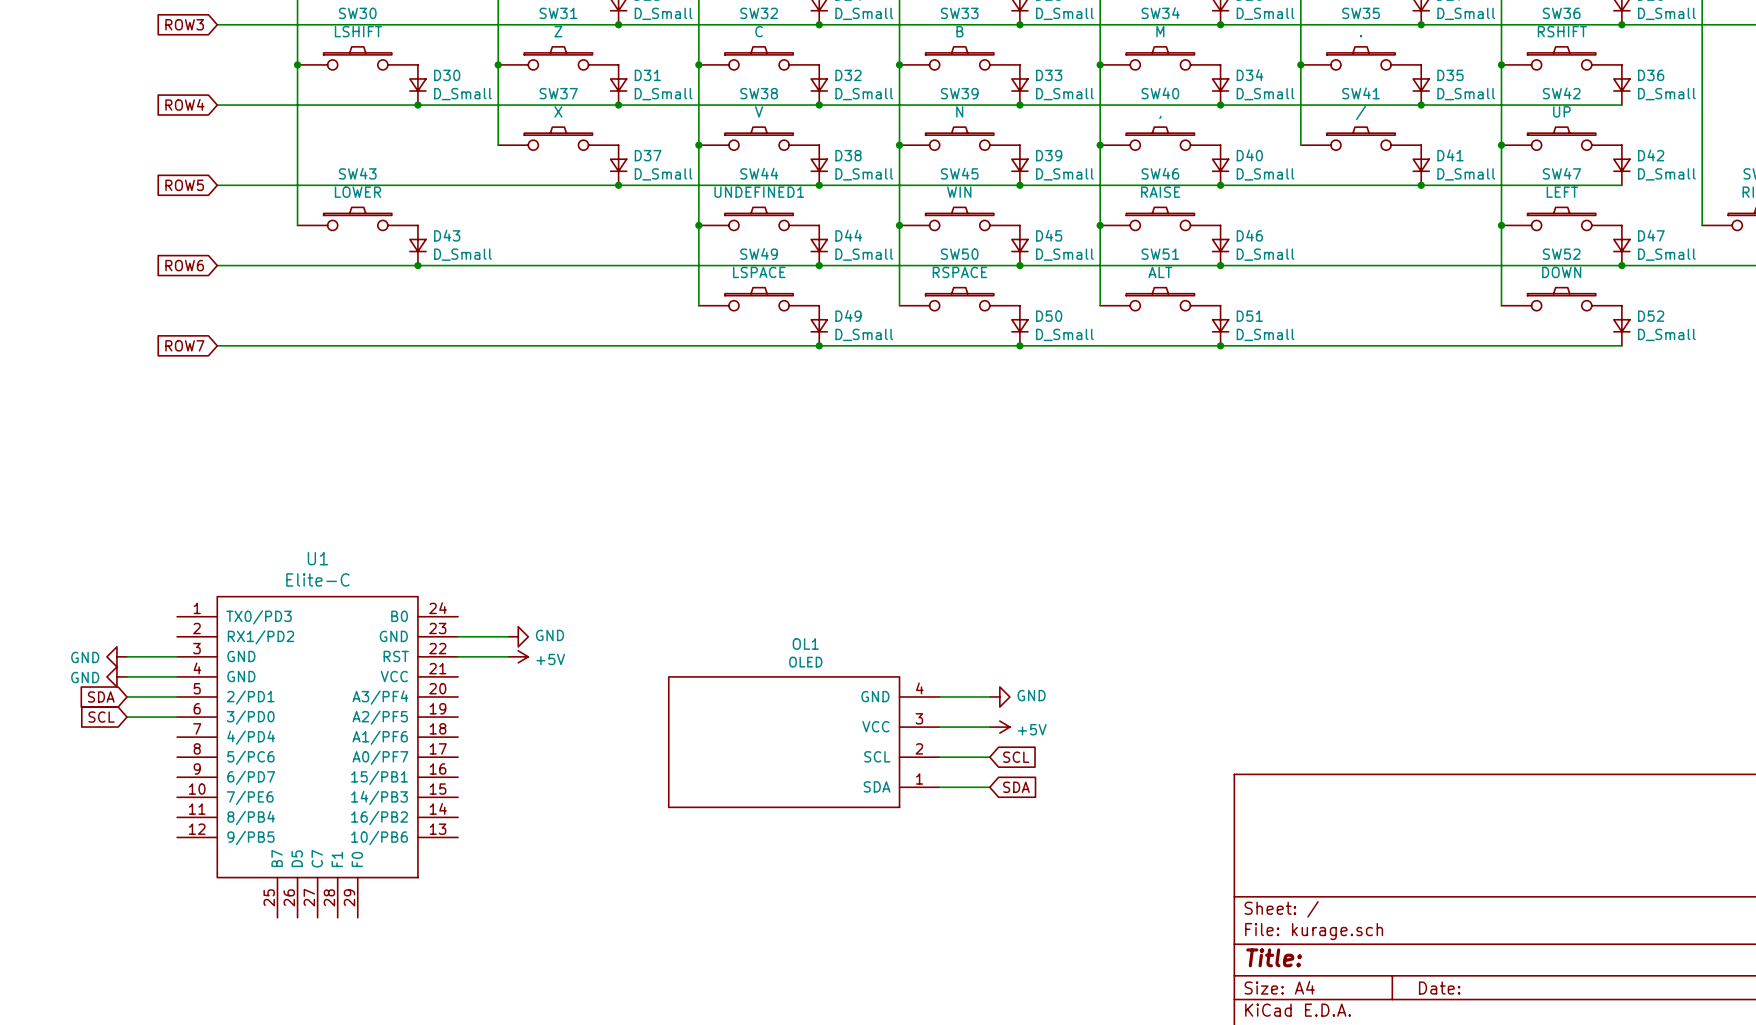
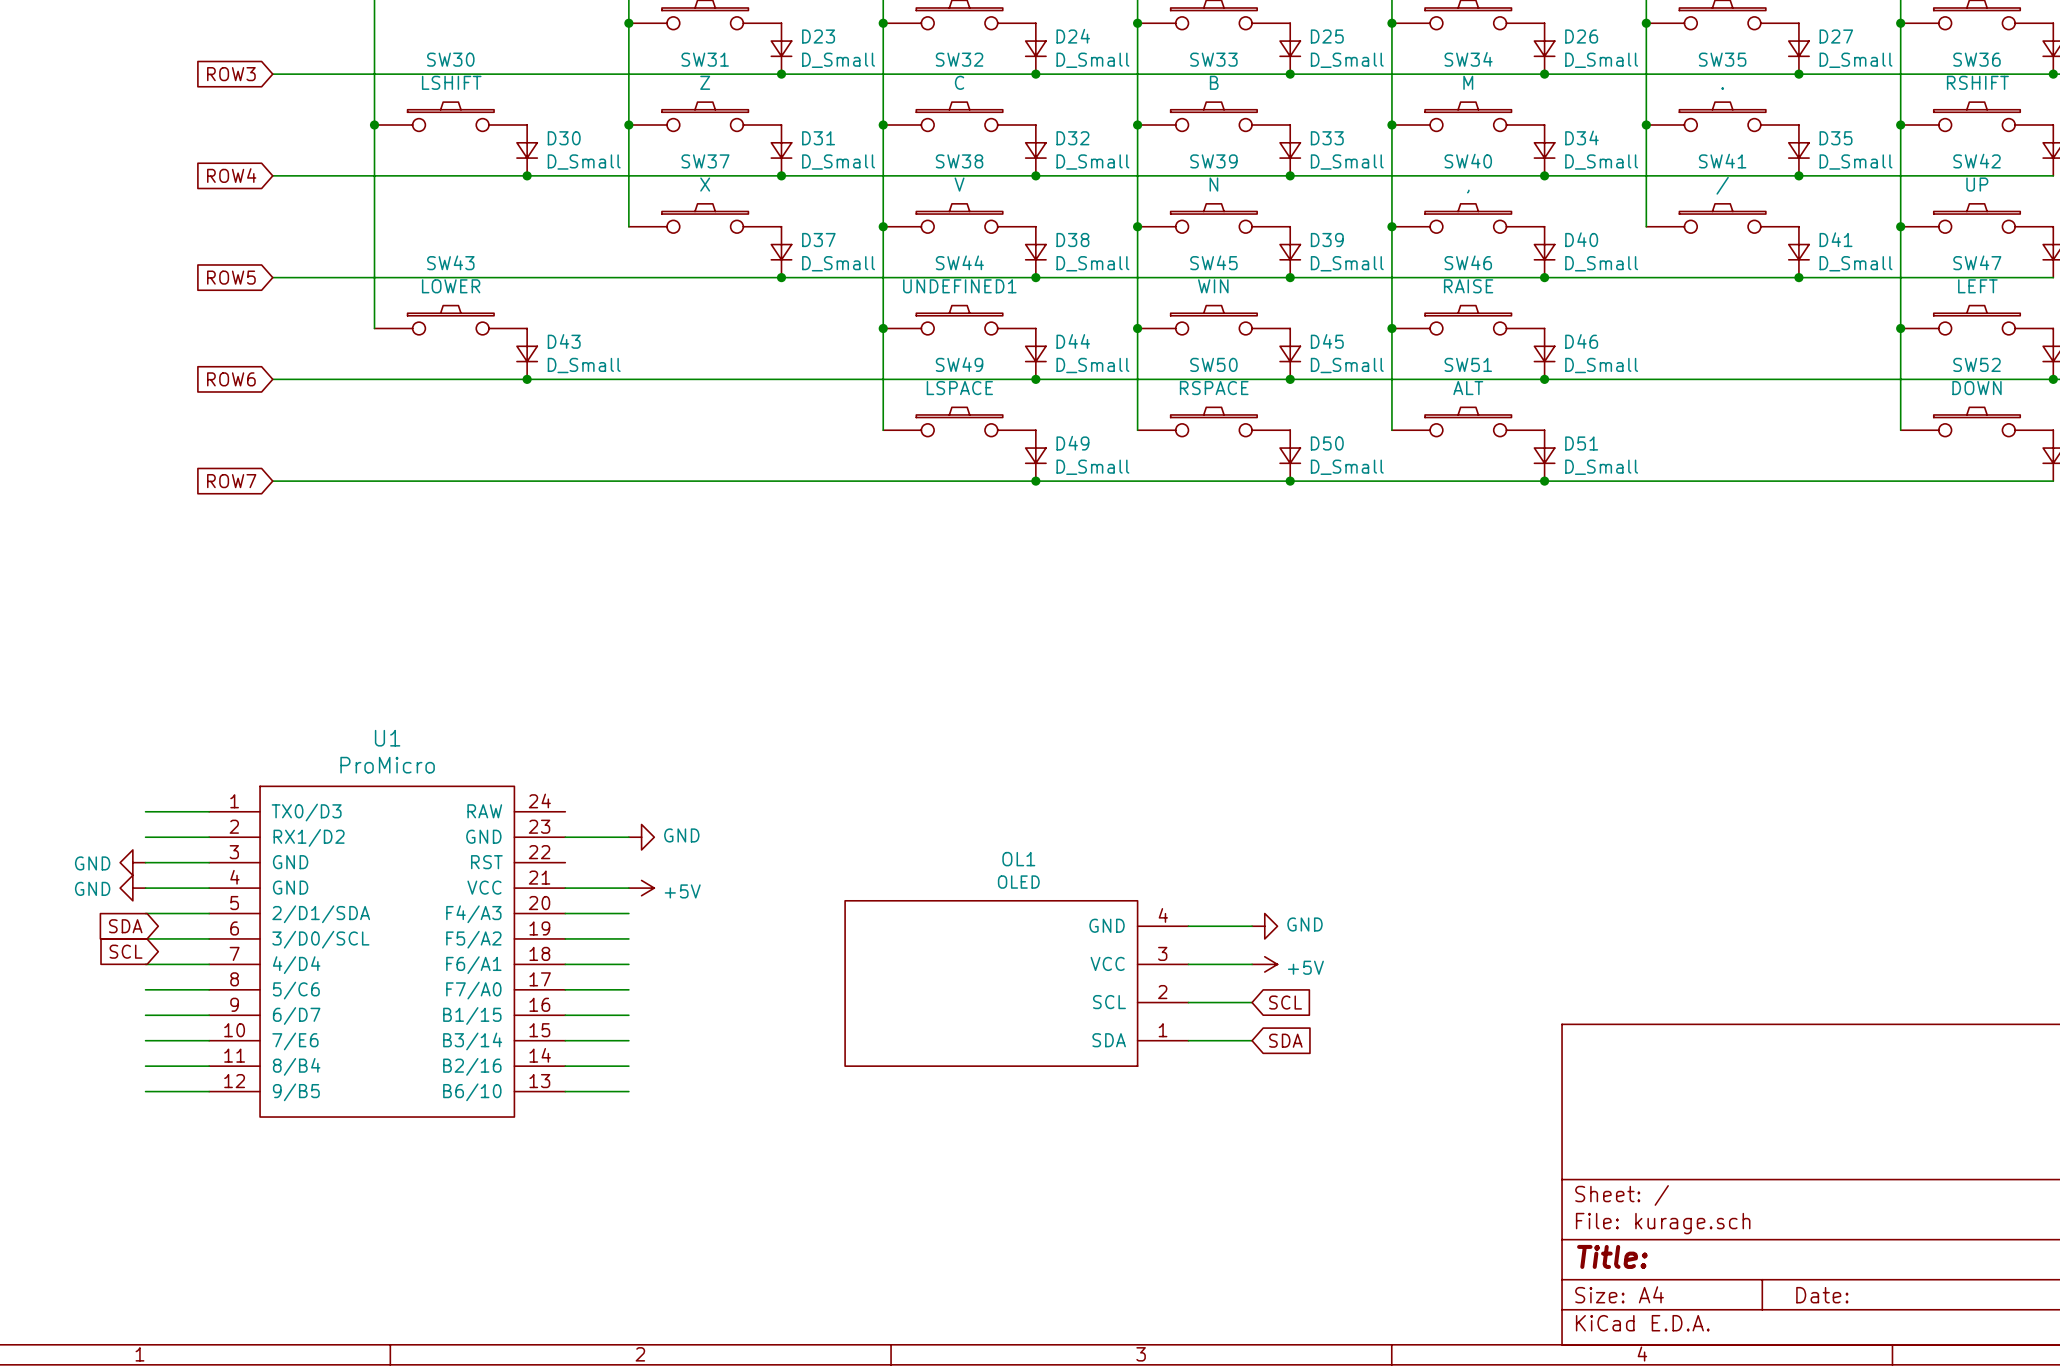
U1 name position: U1 (317, 558) -> U1 (387, 738)
U1 value: Elite-C (317, 579) -> ProMicro (387, 765)
U1 symbol: [177, 596, 459, 918] -> [209, 786, 566, 1118]
wire: none -> (145, 811) (209, 811)
wire: none -> (145, 837) (209, 837)
wire: none -> (565, 837) (628, 837)
wire: (458, 636) (508, 636) -> (565, 888) (628, 888)
power symbol position: GND (518, 636) -> GND (641, 837)
power symbol: none -> GND (132, 862)
wire: none -> (145, 862) (209, 862)
power symbol: GND (116, 656) -> none
wire: (126, 656) (177, 656) -> (145, 913) (209, 913)
wire: (458, 656) (508, 656) -> (565, 913) (628, 913)
power symbol position: +5V (518, 656) -> +5V (641, 888)
power symbol: none -> GND (132, 888)
wire: none -> (145, 888) (209, 888)
power symbol: GND (116, 676) -> none
wire: (126, 676) (177, 676) -> (145, 938) (209, 938)
wire: (126, 696) (177, 696) -> (145, 964) (209, 964)
wire: none -> (565, 938) (628, 938)
wire: (126, 717) (177, 717) -> (145, 989) (209, 989)
wire: none -> (565, 964) (628, 964)
wire: none -> (565, 989) (628, 989)
wire: none -> (145, 1015) (209, 1015)
wire: none -> (565, 1015) (628, 1015)
wire: none -> (145, 1040) (209, 1040)
wire: none -> (565, 1040) (628, 1040)
wire: none -> (145, 1066) (209, 1066)
wire: none -> (565, 1066) (628, 1066)
wire: none -> (145, 1091) (209, 1091)
wire: none -> (565, 1091) (628, 1091)

